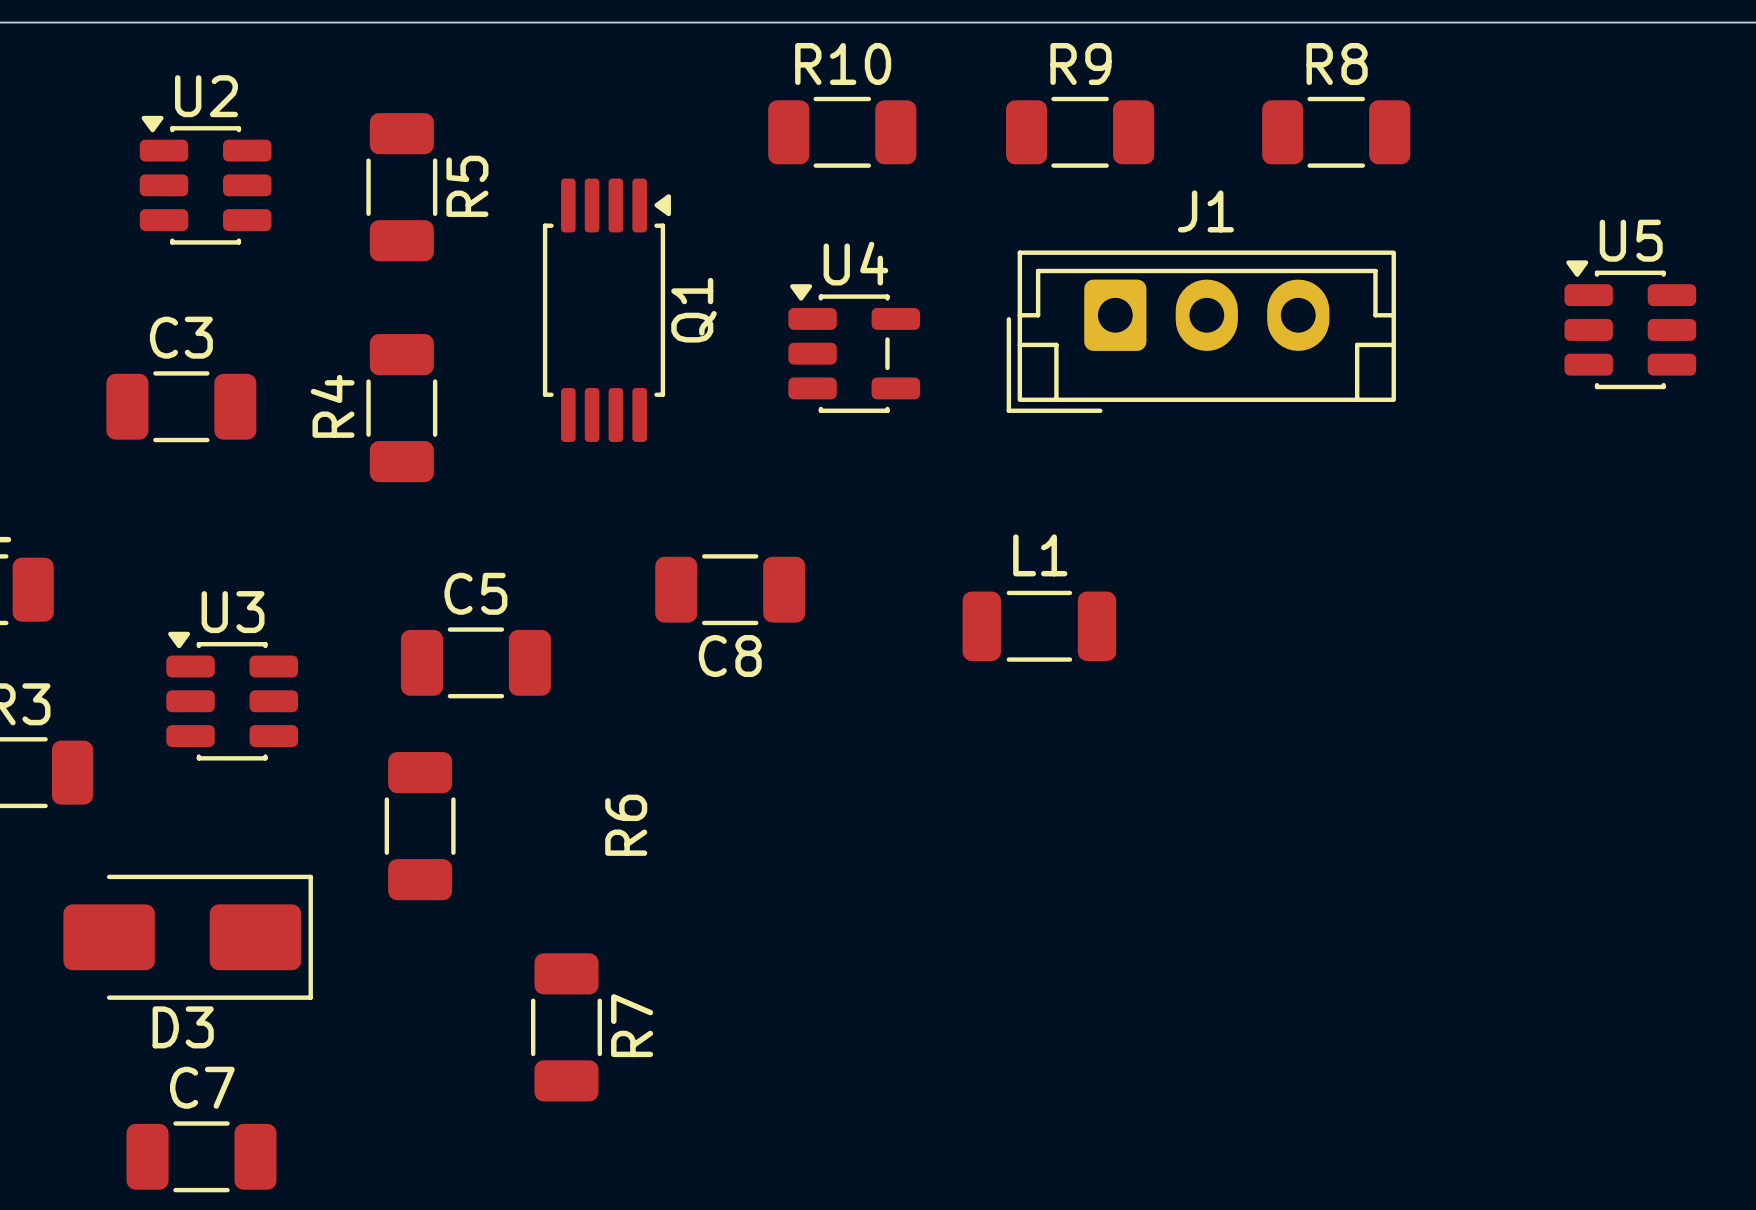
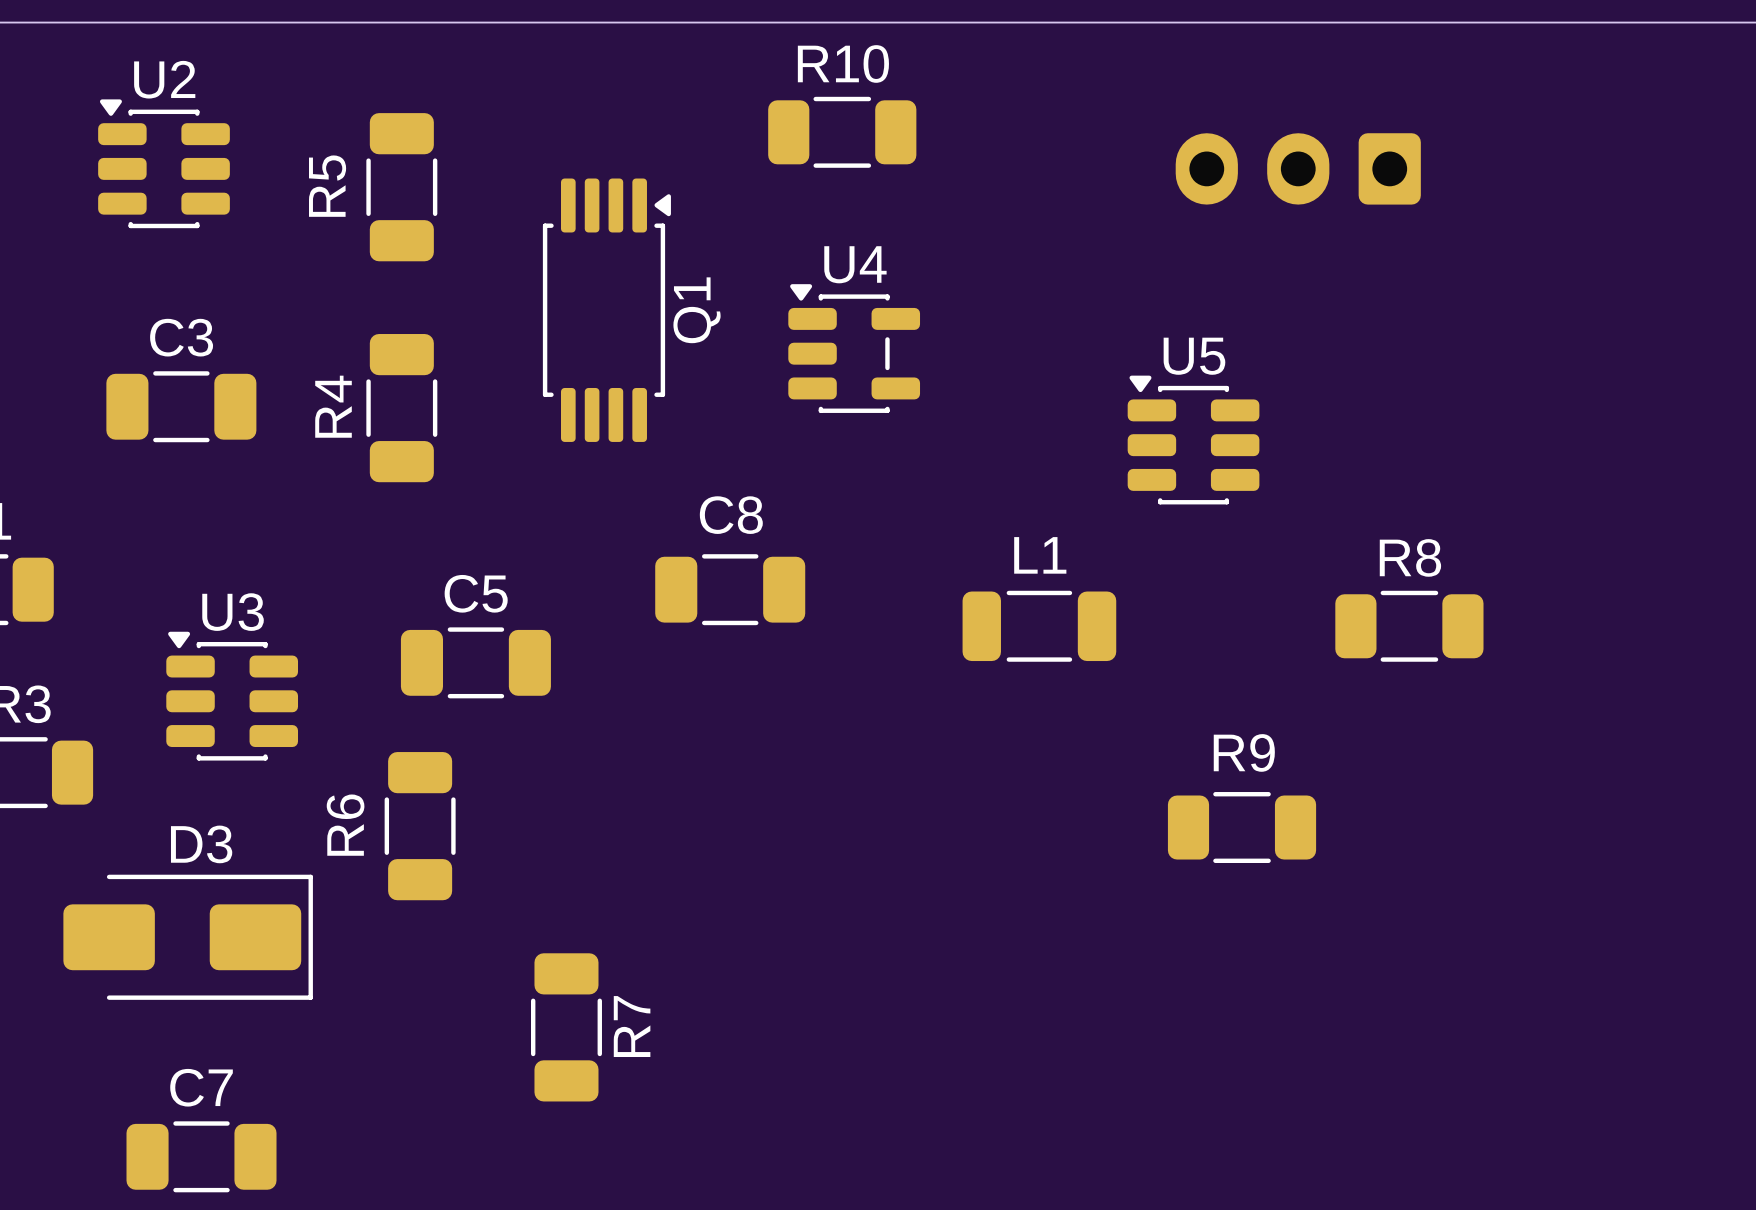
R9 name position: R9 (1080, 63) -> R9 (1244, 752)
R9 position: (1080, 132) -> (1242, 827)
R8 position: (1336, 132) -> (1409, 626)
U2 position: (205, 180) -> (164, 163)
R5 name position: R5 (467, 186) -> R5 (327, 186)
U5 position: (1630, 324) -> (1193, 440)
J1 side: top (1201, 331) -> bottom (1298, 168)
C8 name position: C8 (730, 656) -> C8 (731, 515)
R6 name position: R6 (626, 825) -> R6 (345, 825)
D3 name position: D3 (183, 1027) -> D3 (201, 844)

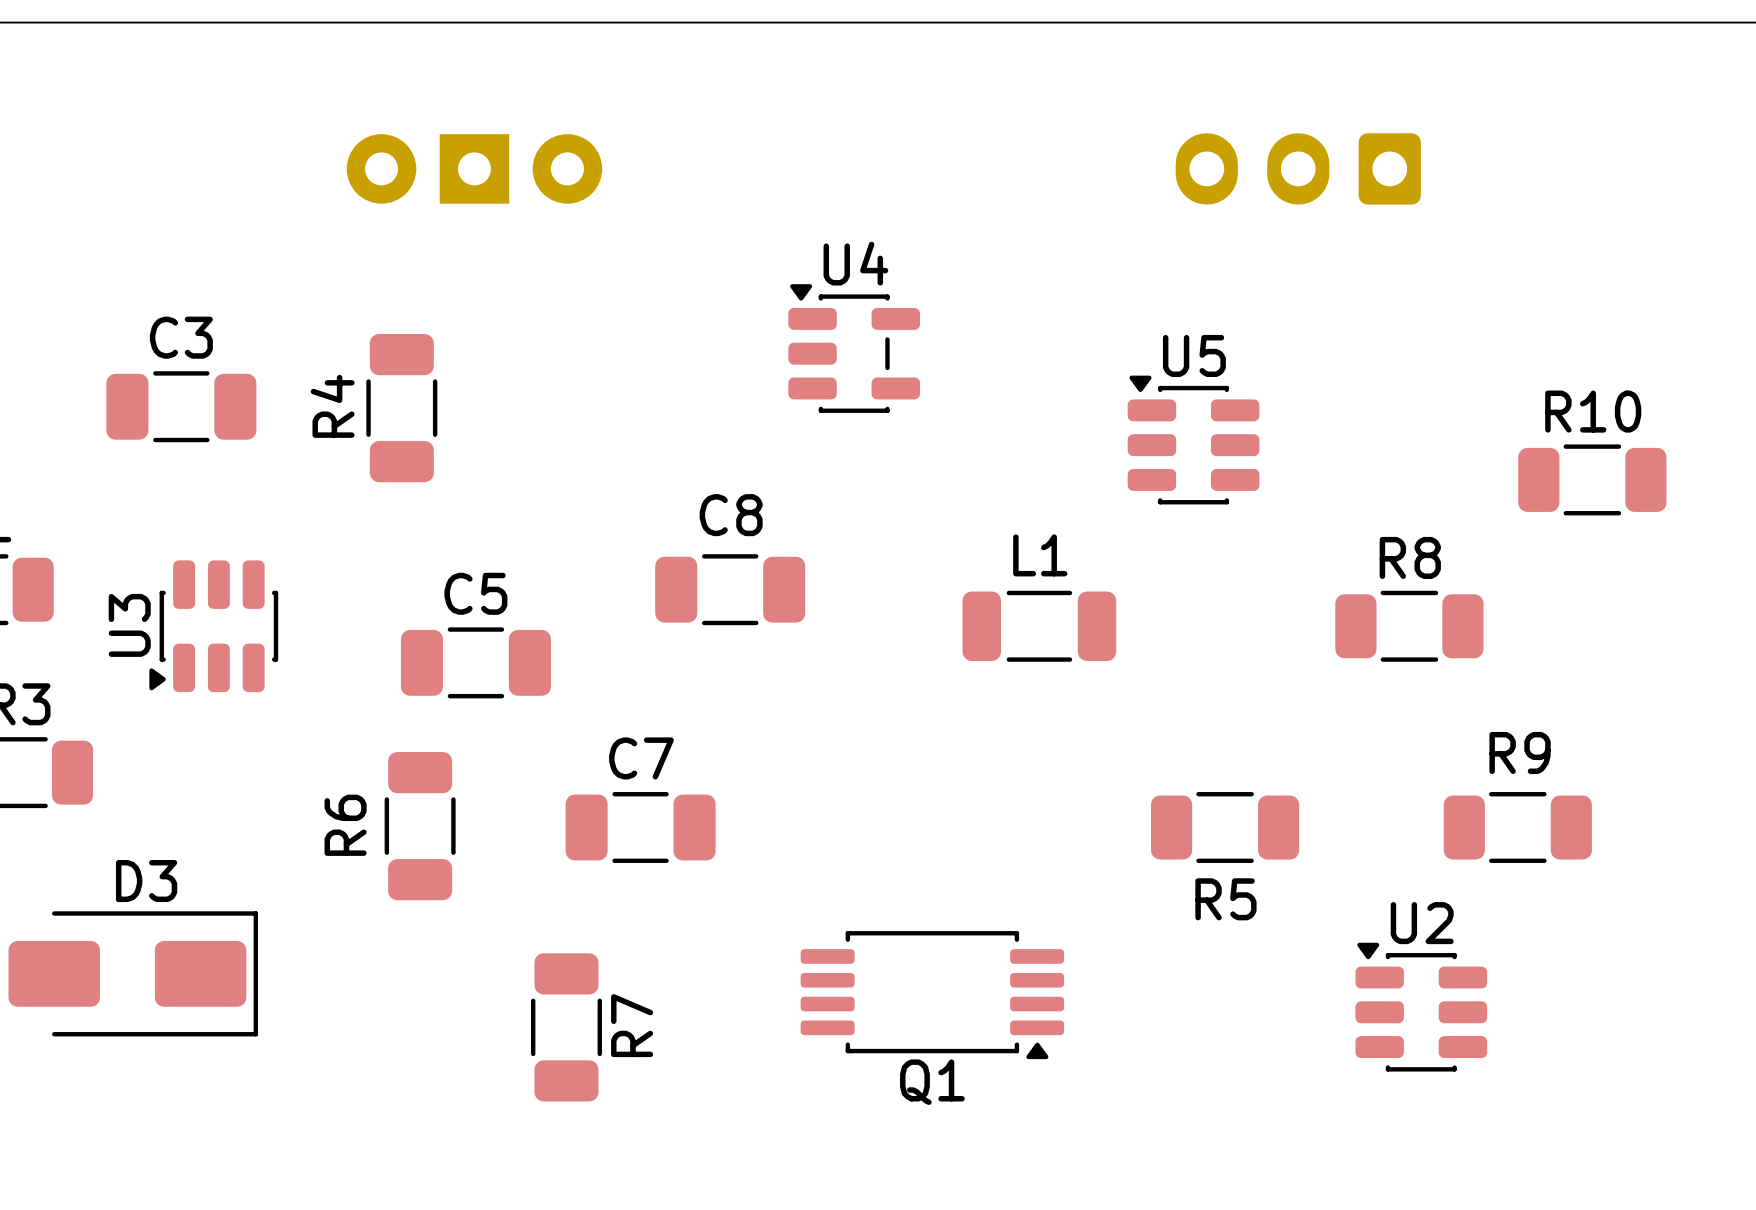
R10 position: (842, 132) -> (1592, 479)
U2 position: (164, 163) -> (1421, 1007)
part: none -> (474, 168)
R5 name position: R5 (327, 186) -> R5 (1225, 899)
R5 rotation: 0° (401, 187) -> 90° clockwise (1225, 827)
R5 position: (401, 187) -> (1225, 827)
Q1 rotation: 0° (606, 310) -> 90° clockwise (932, 995)
Q1 position: (606, 310) -> (932, 995)
U3 rotation: 0° (232, 696) -> 90° counterclockwise (213, 626)
R9 position: (1242, 827) -> (1517, 827)
D3 position: (188, 937) -> (133, 973)
C7 position: (201, 1156) -> (640, 827)

